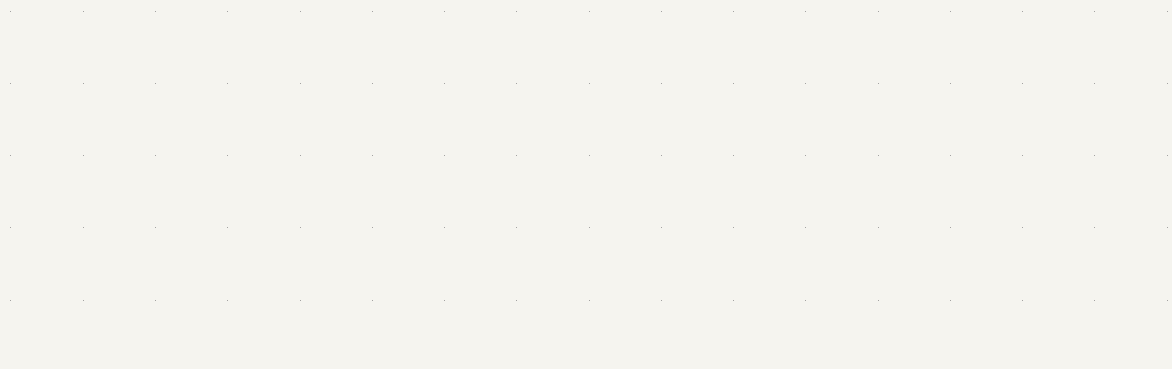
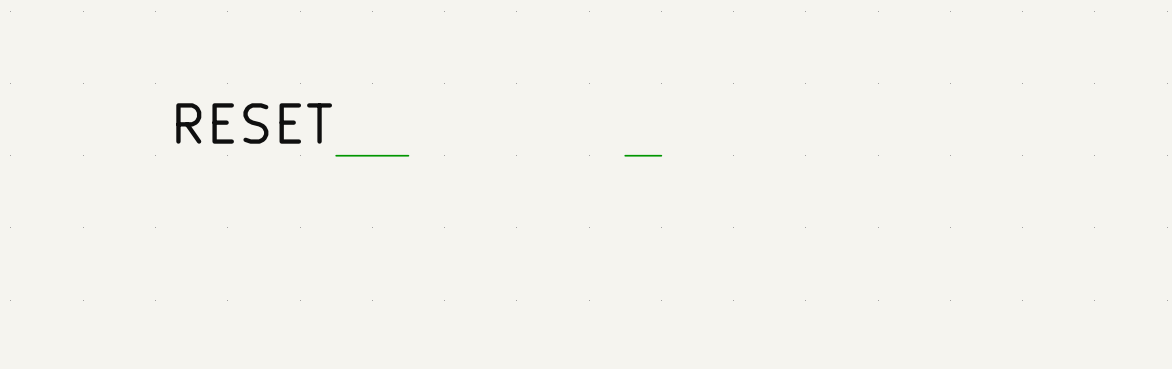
label: none -> RESET (254, 123)
wire: none -> (336, 155) (408, 155)
wire: none -> (625, 155) (661, 155)

